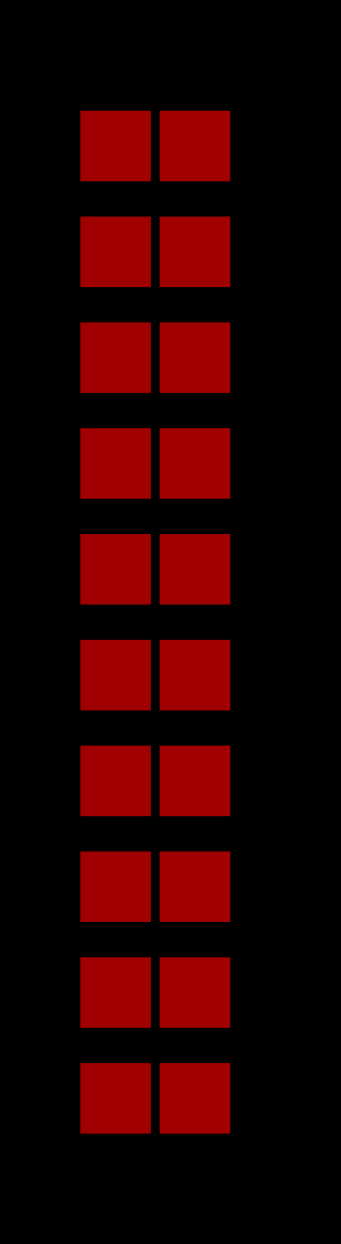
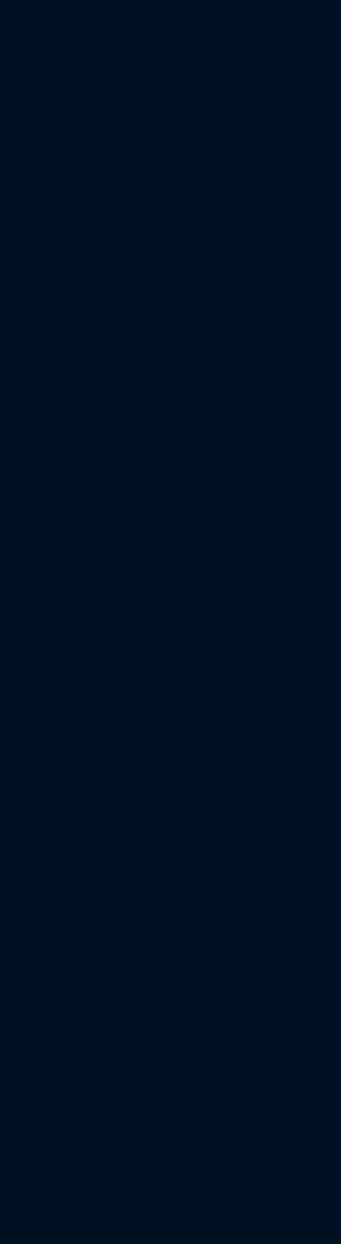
part: (155, 146) -> none
part: (155, 251) -> none
part: (155, 357) -> none
part: (155, 463) -> none
part: (155, 569) -> none
part: (155, 675) -> none
part: (155, 780) -> none
part: (155, 886) -> none
part: (155, 992) -> none
part: (155, 1098) -> none

